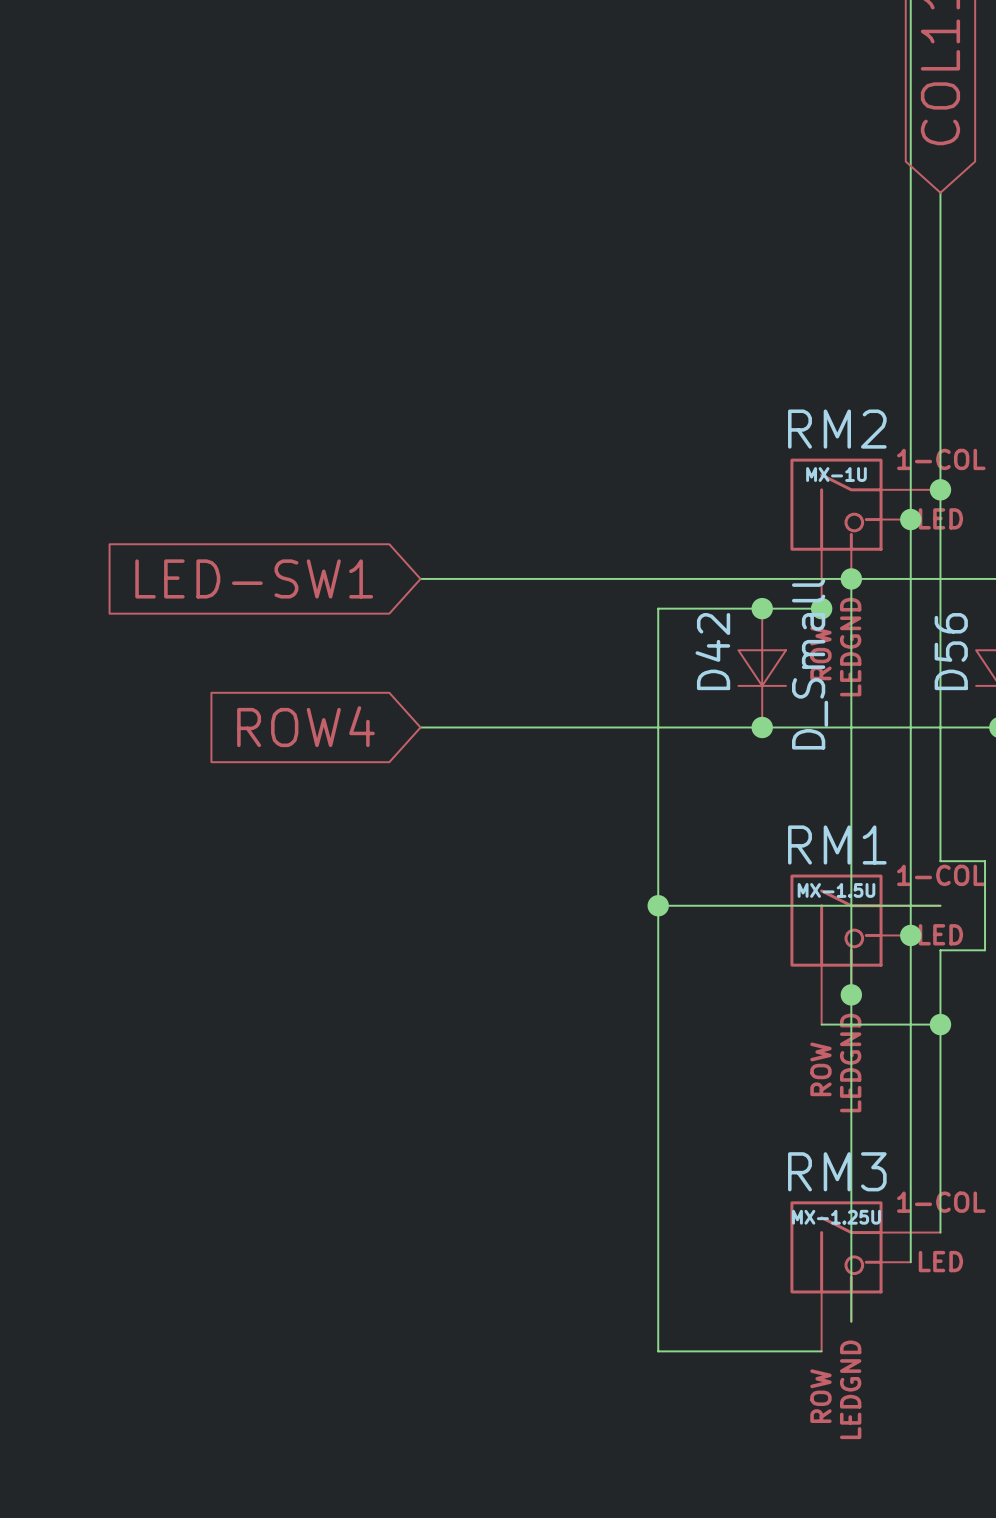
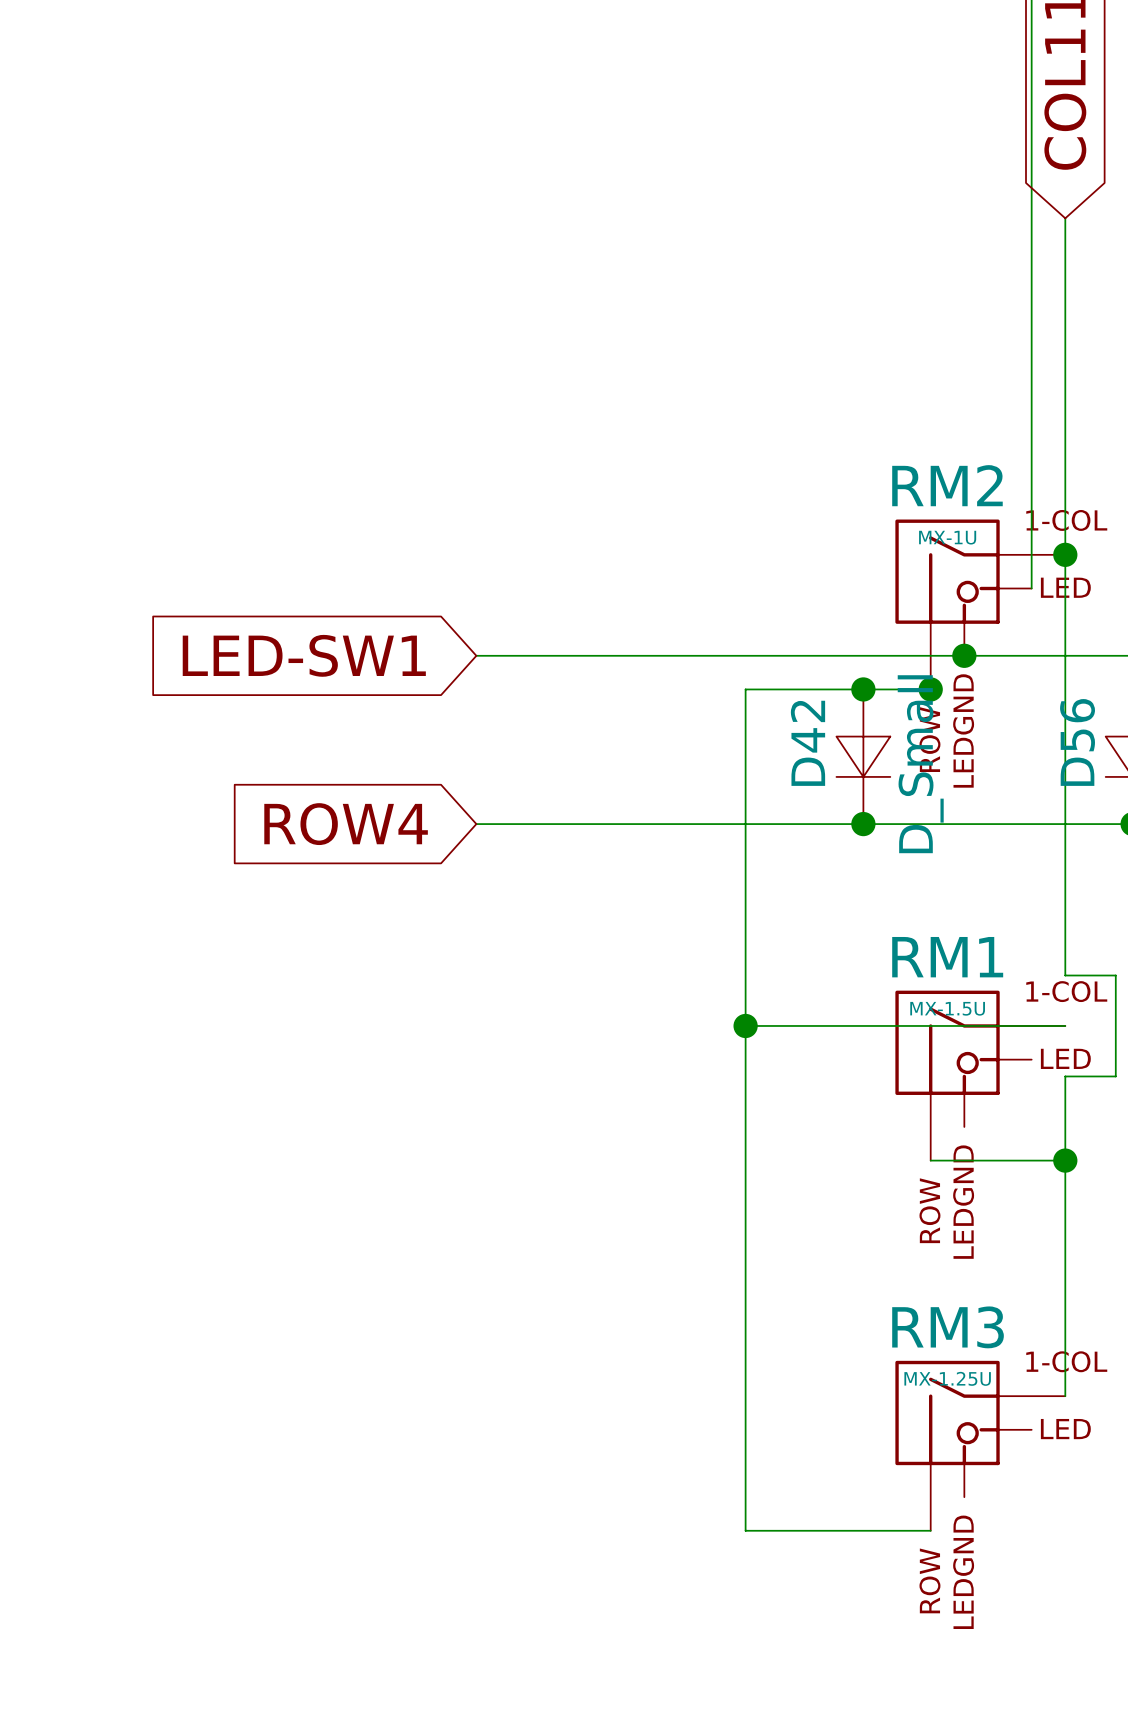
wire: (910, 519) (910, 1262) -> none
junction: (910, 519) -> none
wire: (851, 578) (851, 1321) -> none
junction: (910, 935) -> none
junction: (851, 994) -> none

